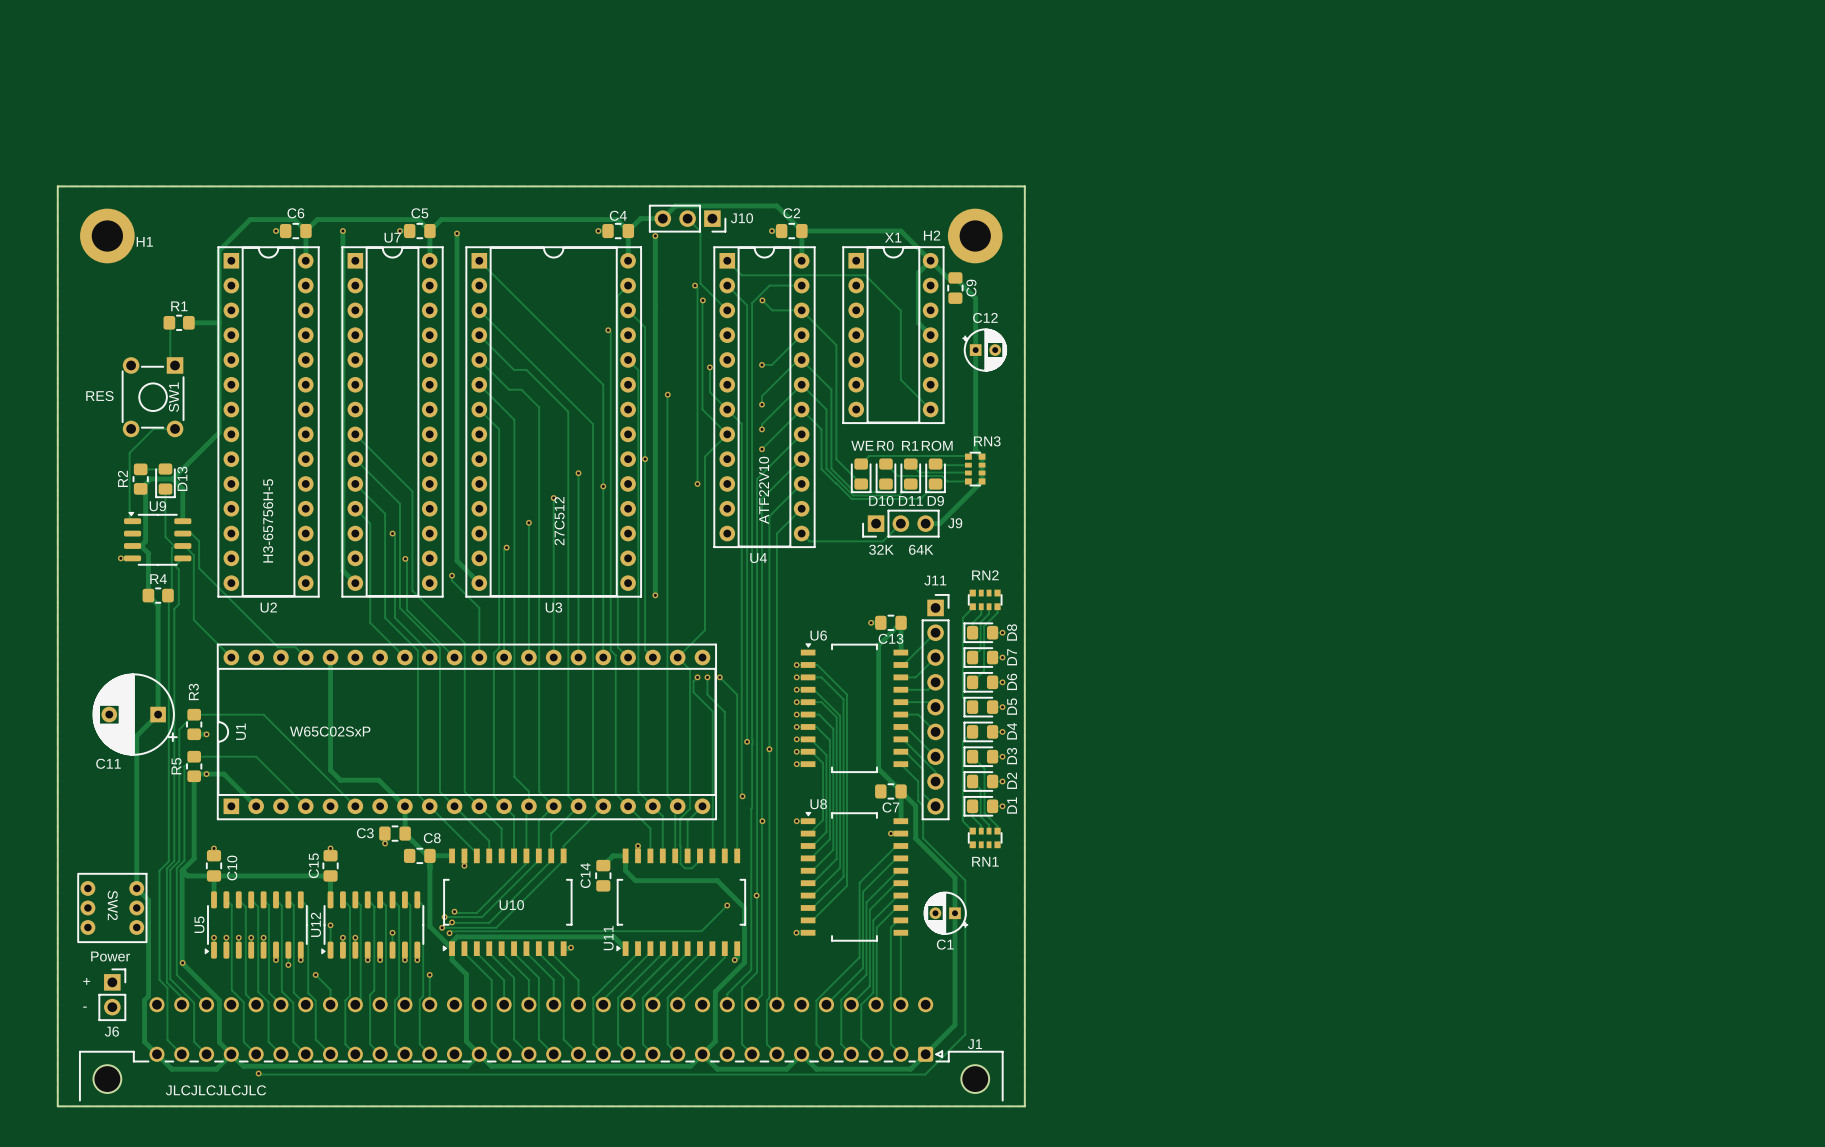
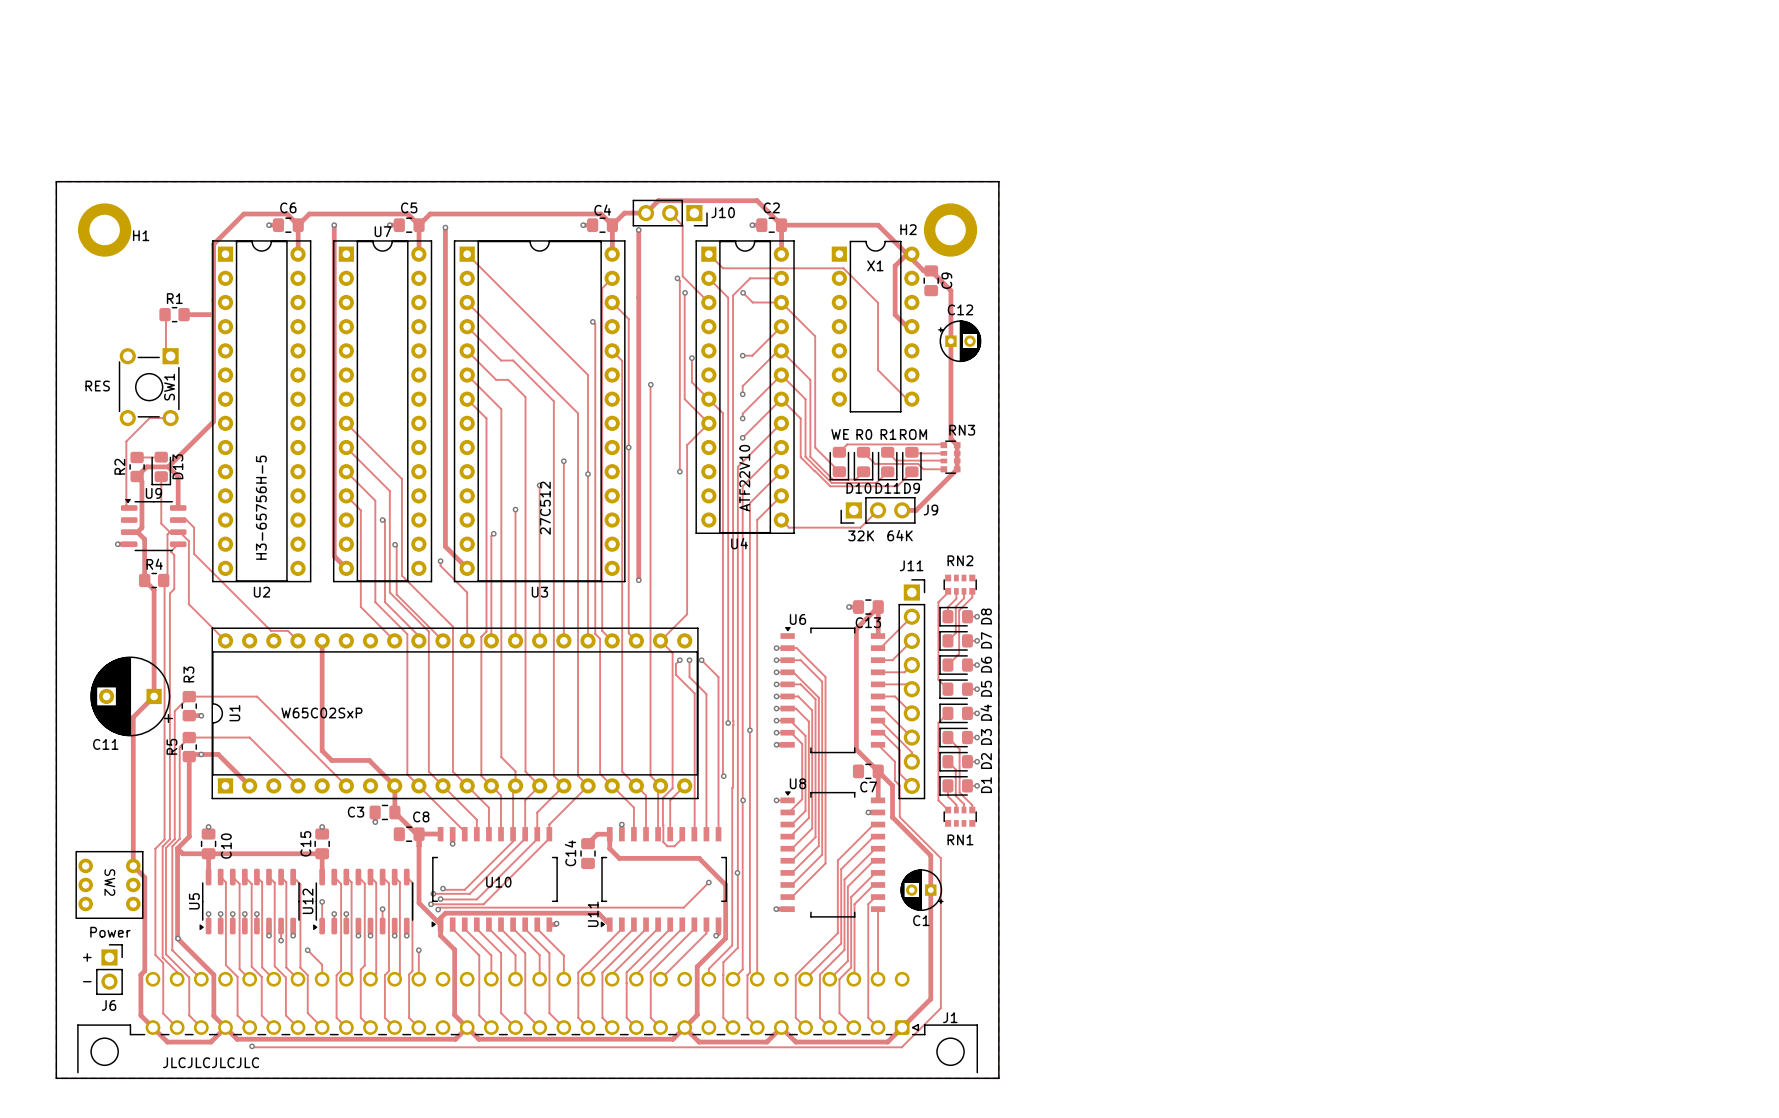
X1 name position: X1 (893, 237) -> X1 (875, 265)
X1 footprint: [842, 246, 945, 424] -> [831, 240, 920, 413]

